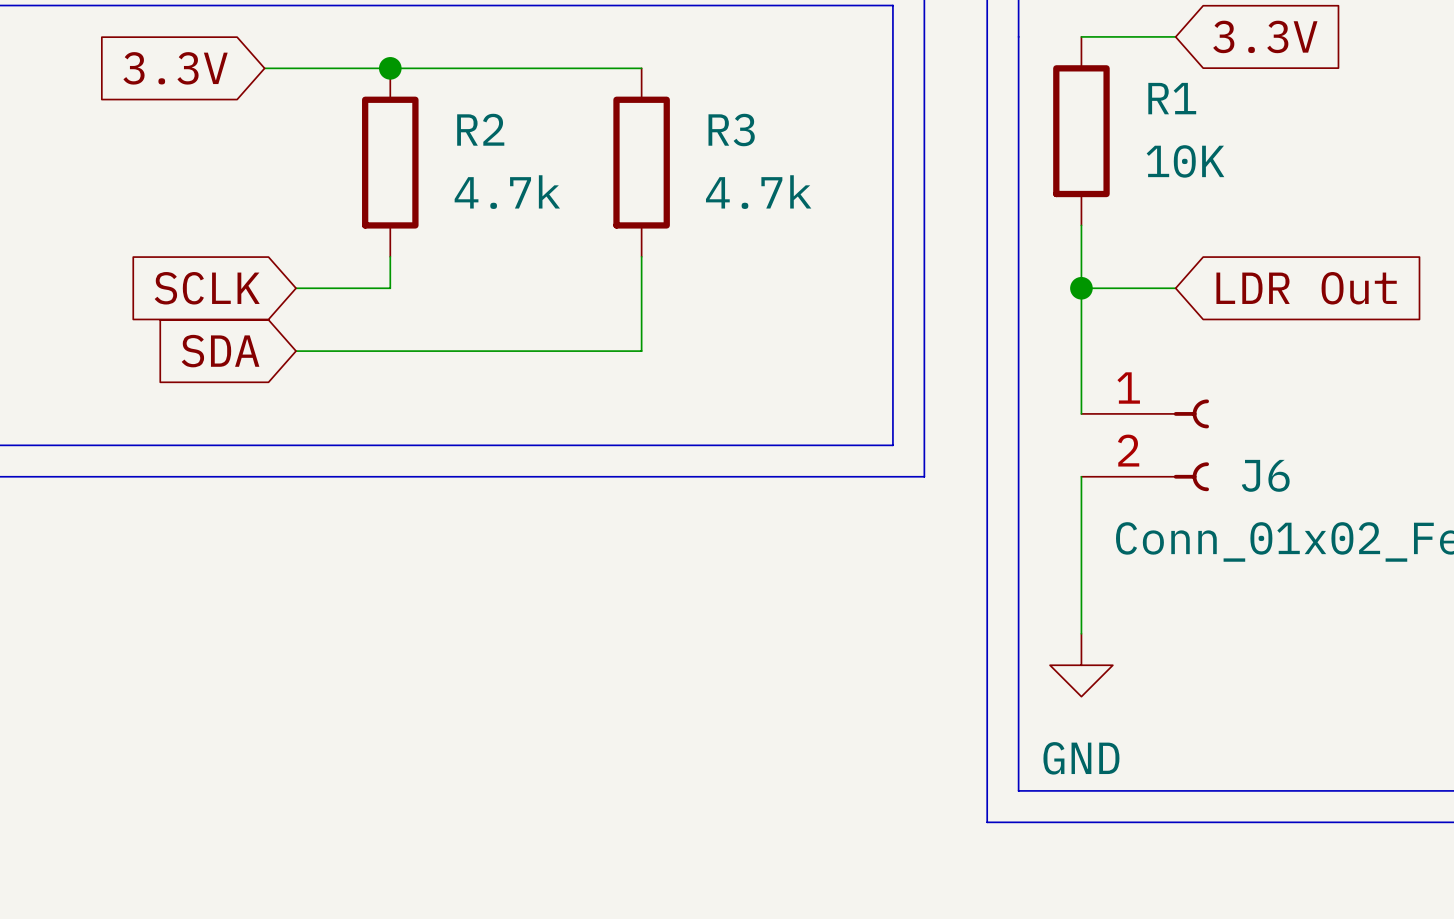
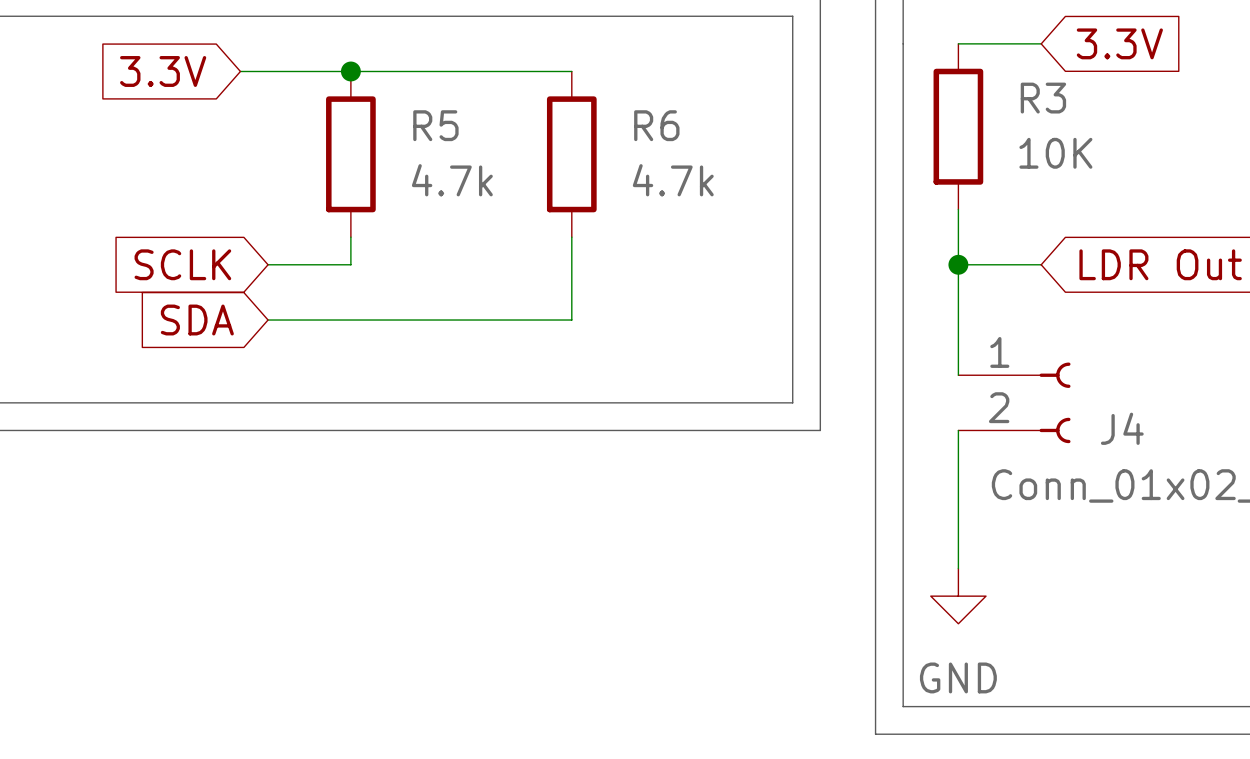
R1 name: R1 (1172, 98) -> R3 (1043, 98)
R2 name: R2 (480, 129) -> R5 (435, 125)
R3 name: R3 (731, 130) -> R6 (656, 125)
J6 name: J6 (1265, 475) -> J4 (1122, 428)

